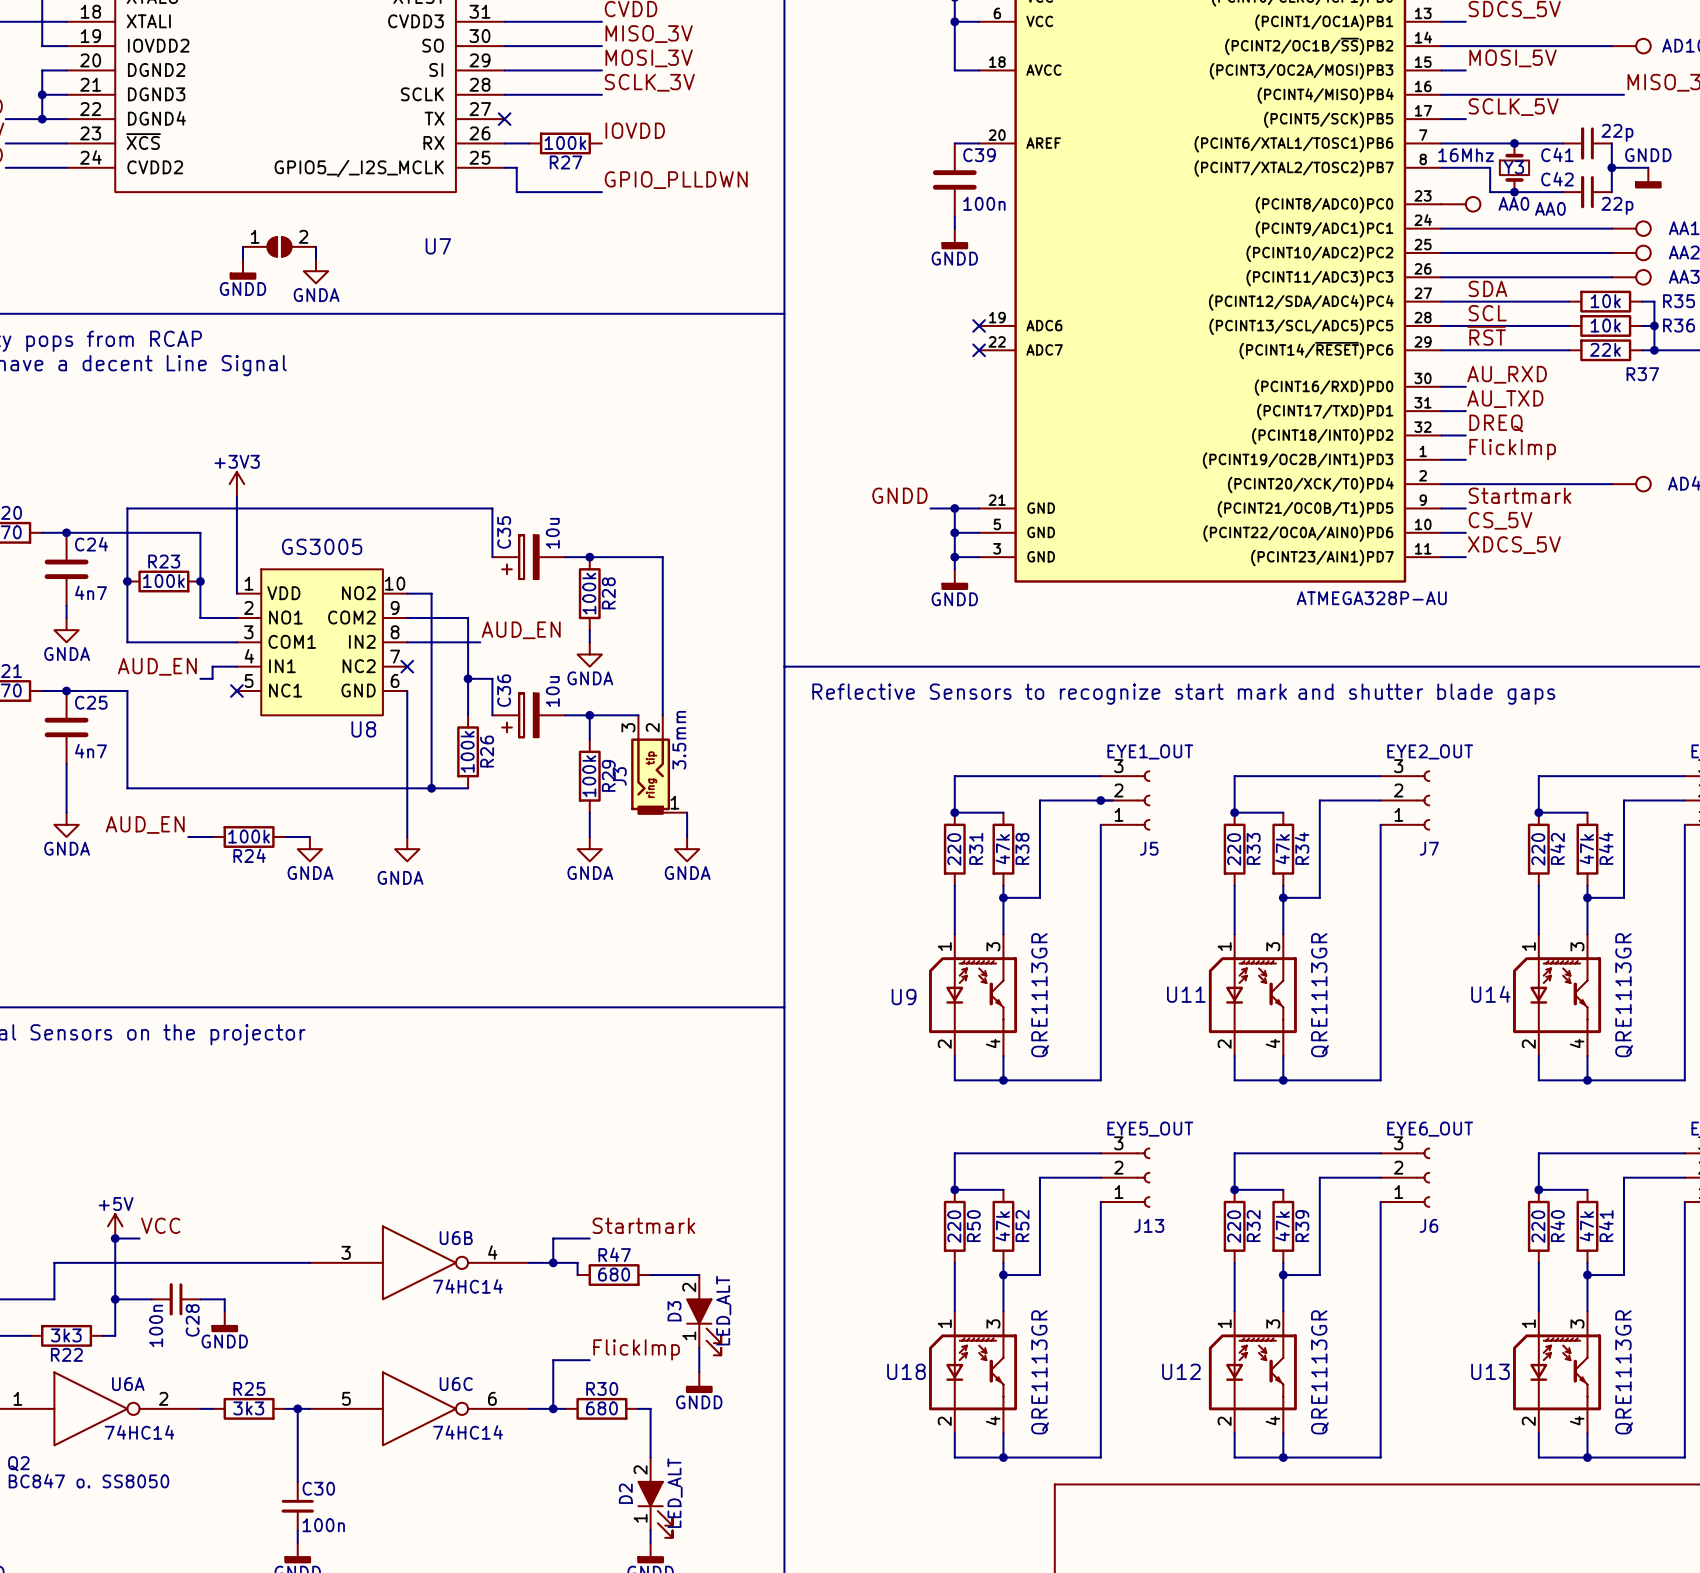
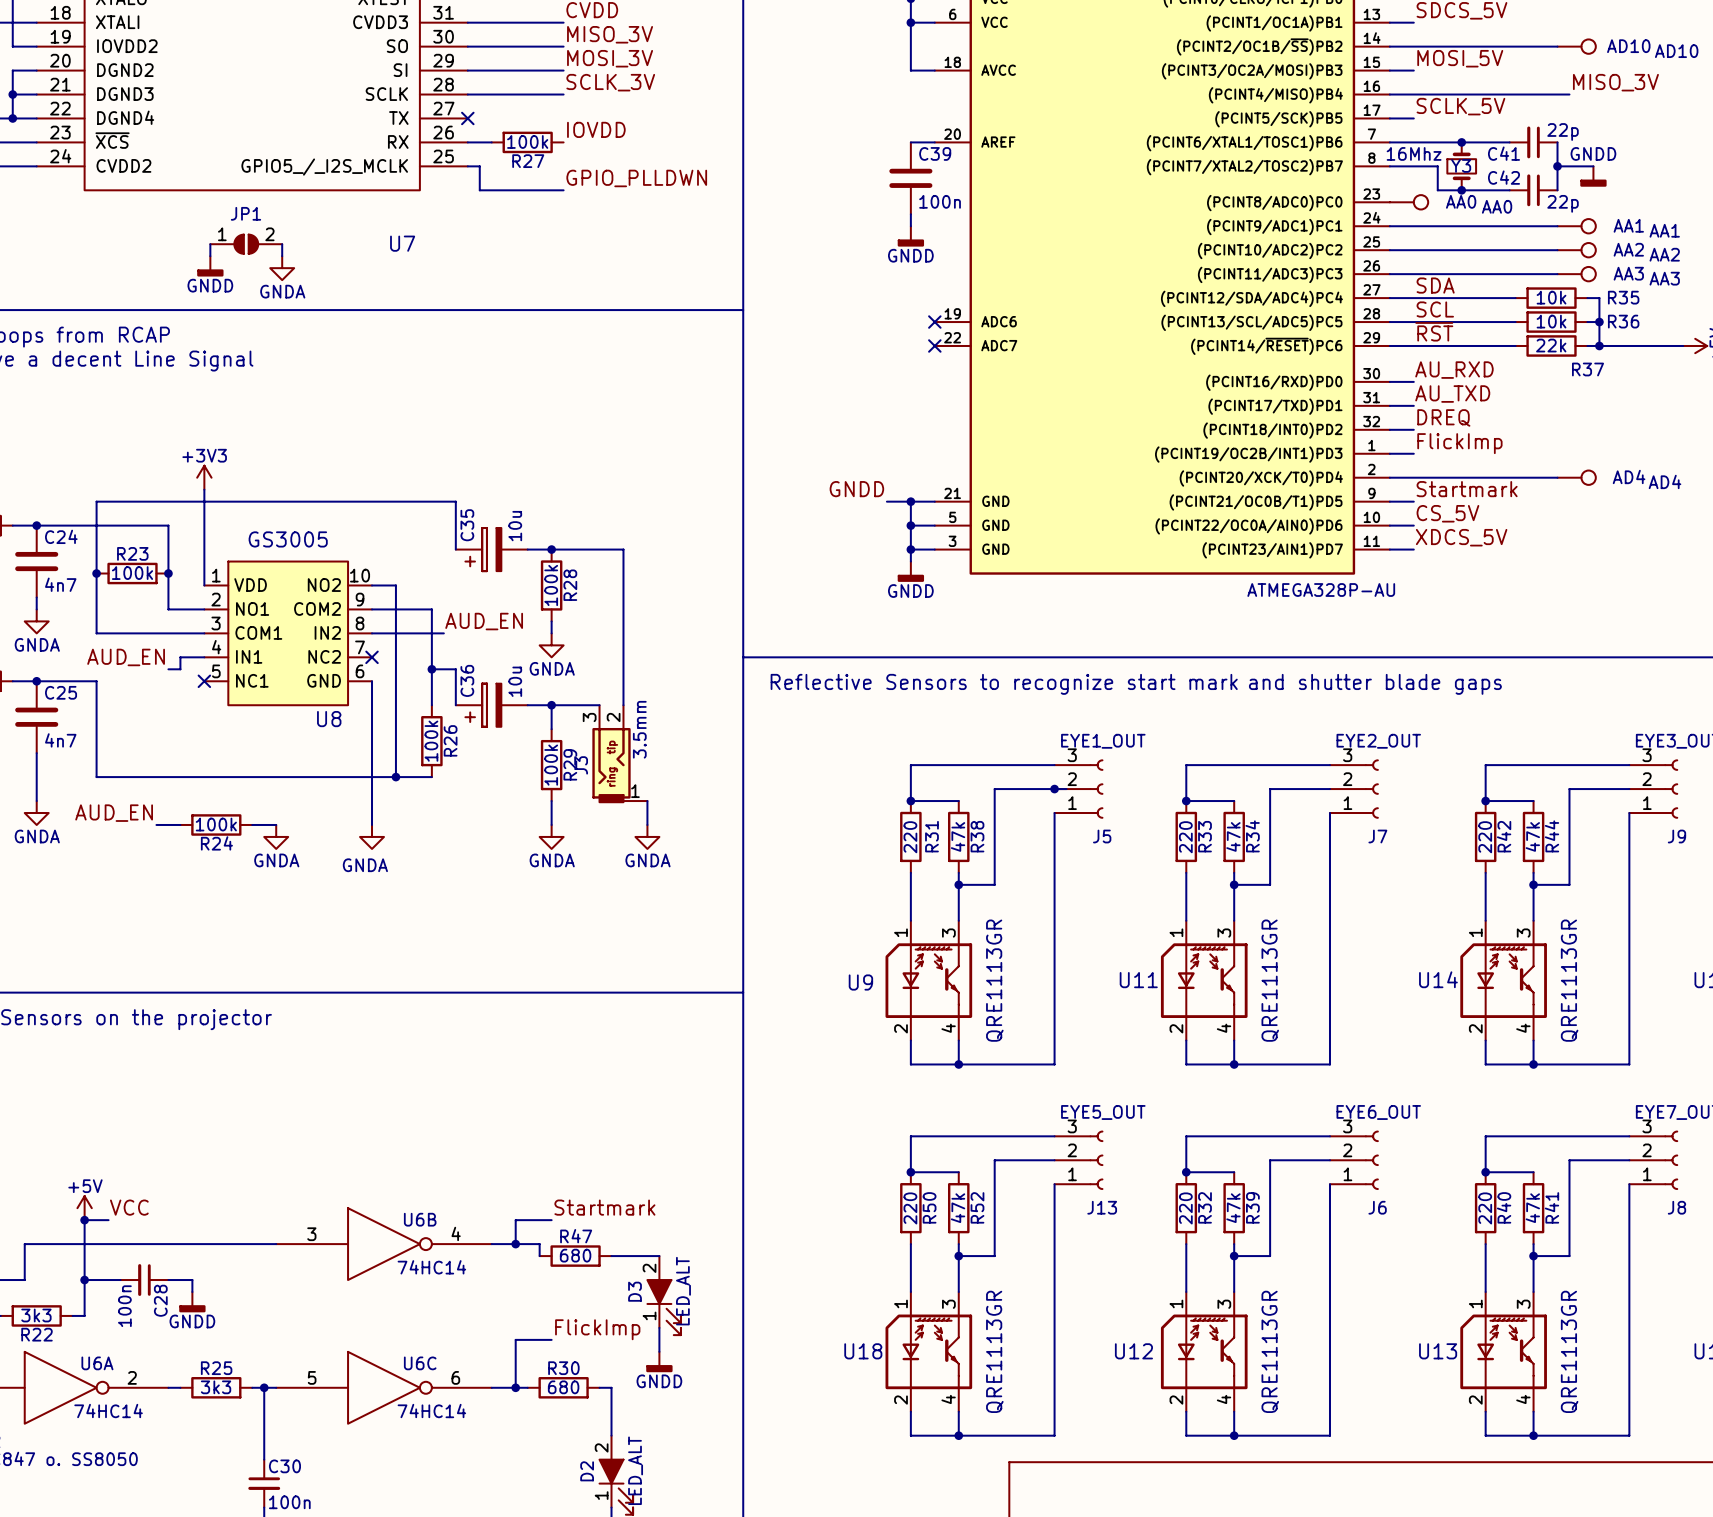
JP1 name: none -> JP1 (245, 213)

